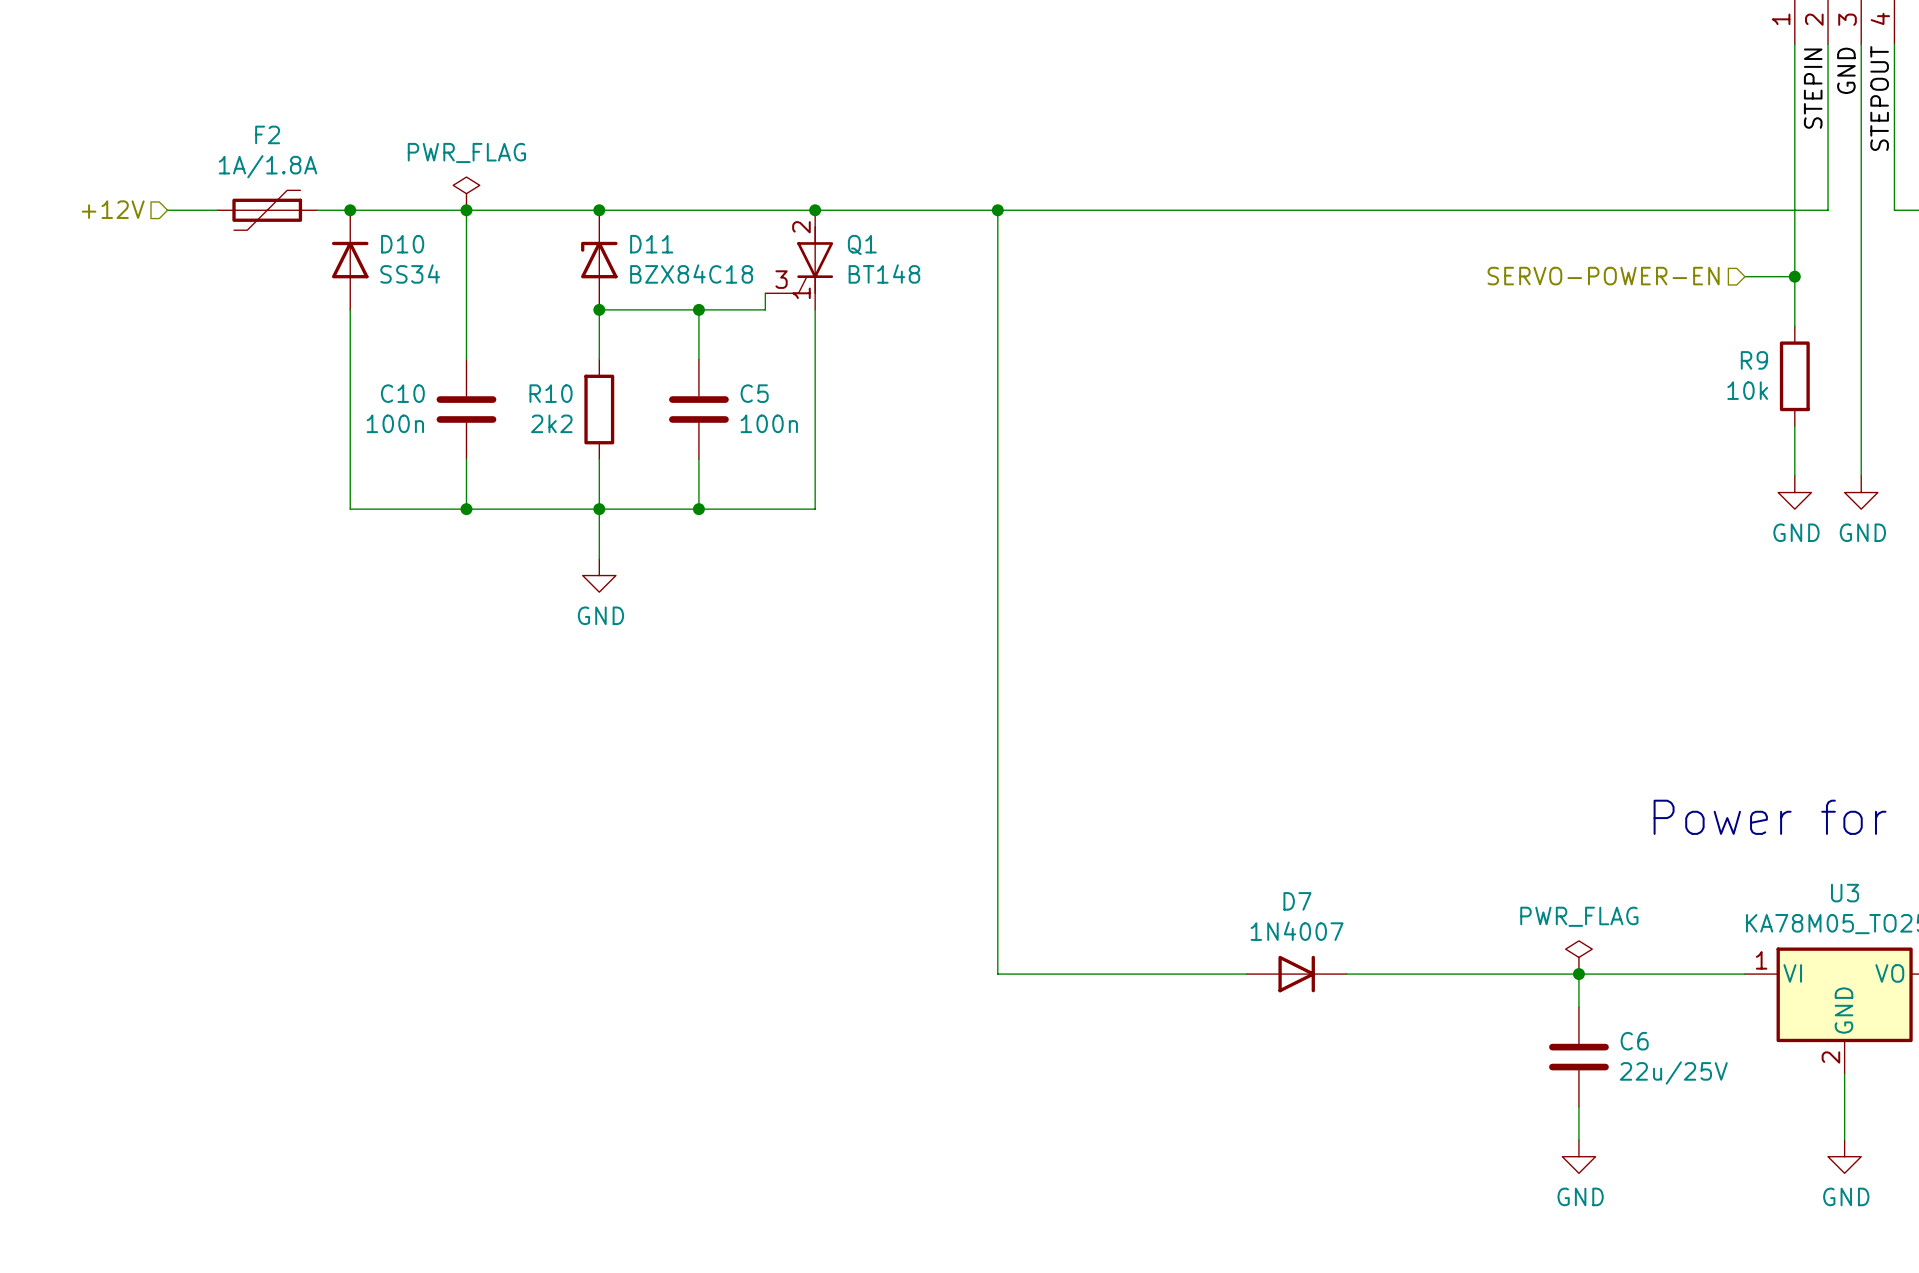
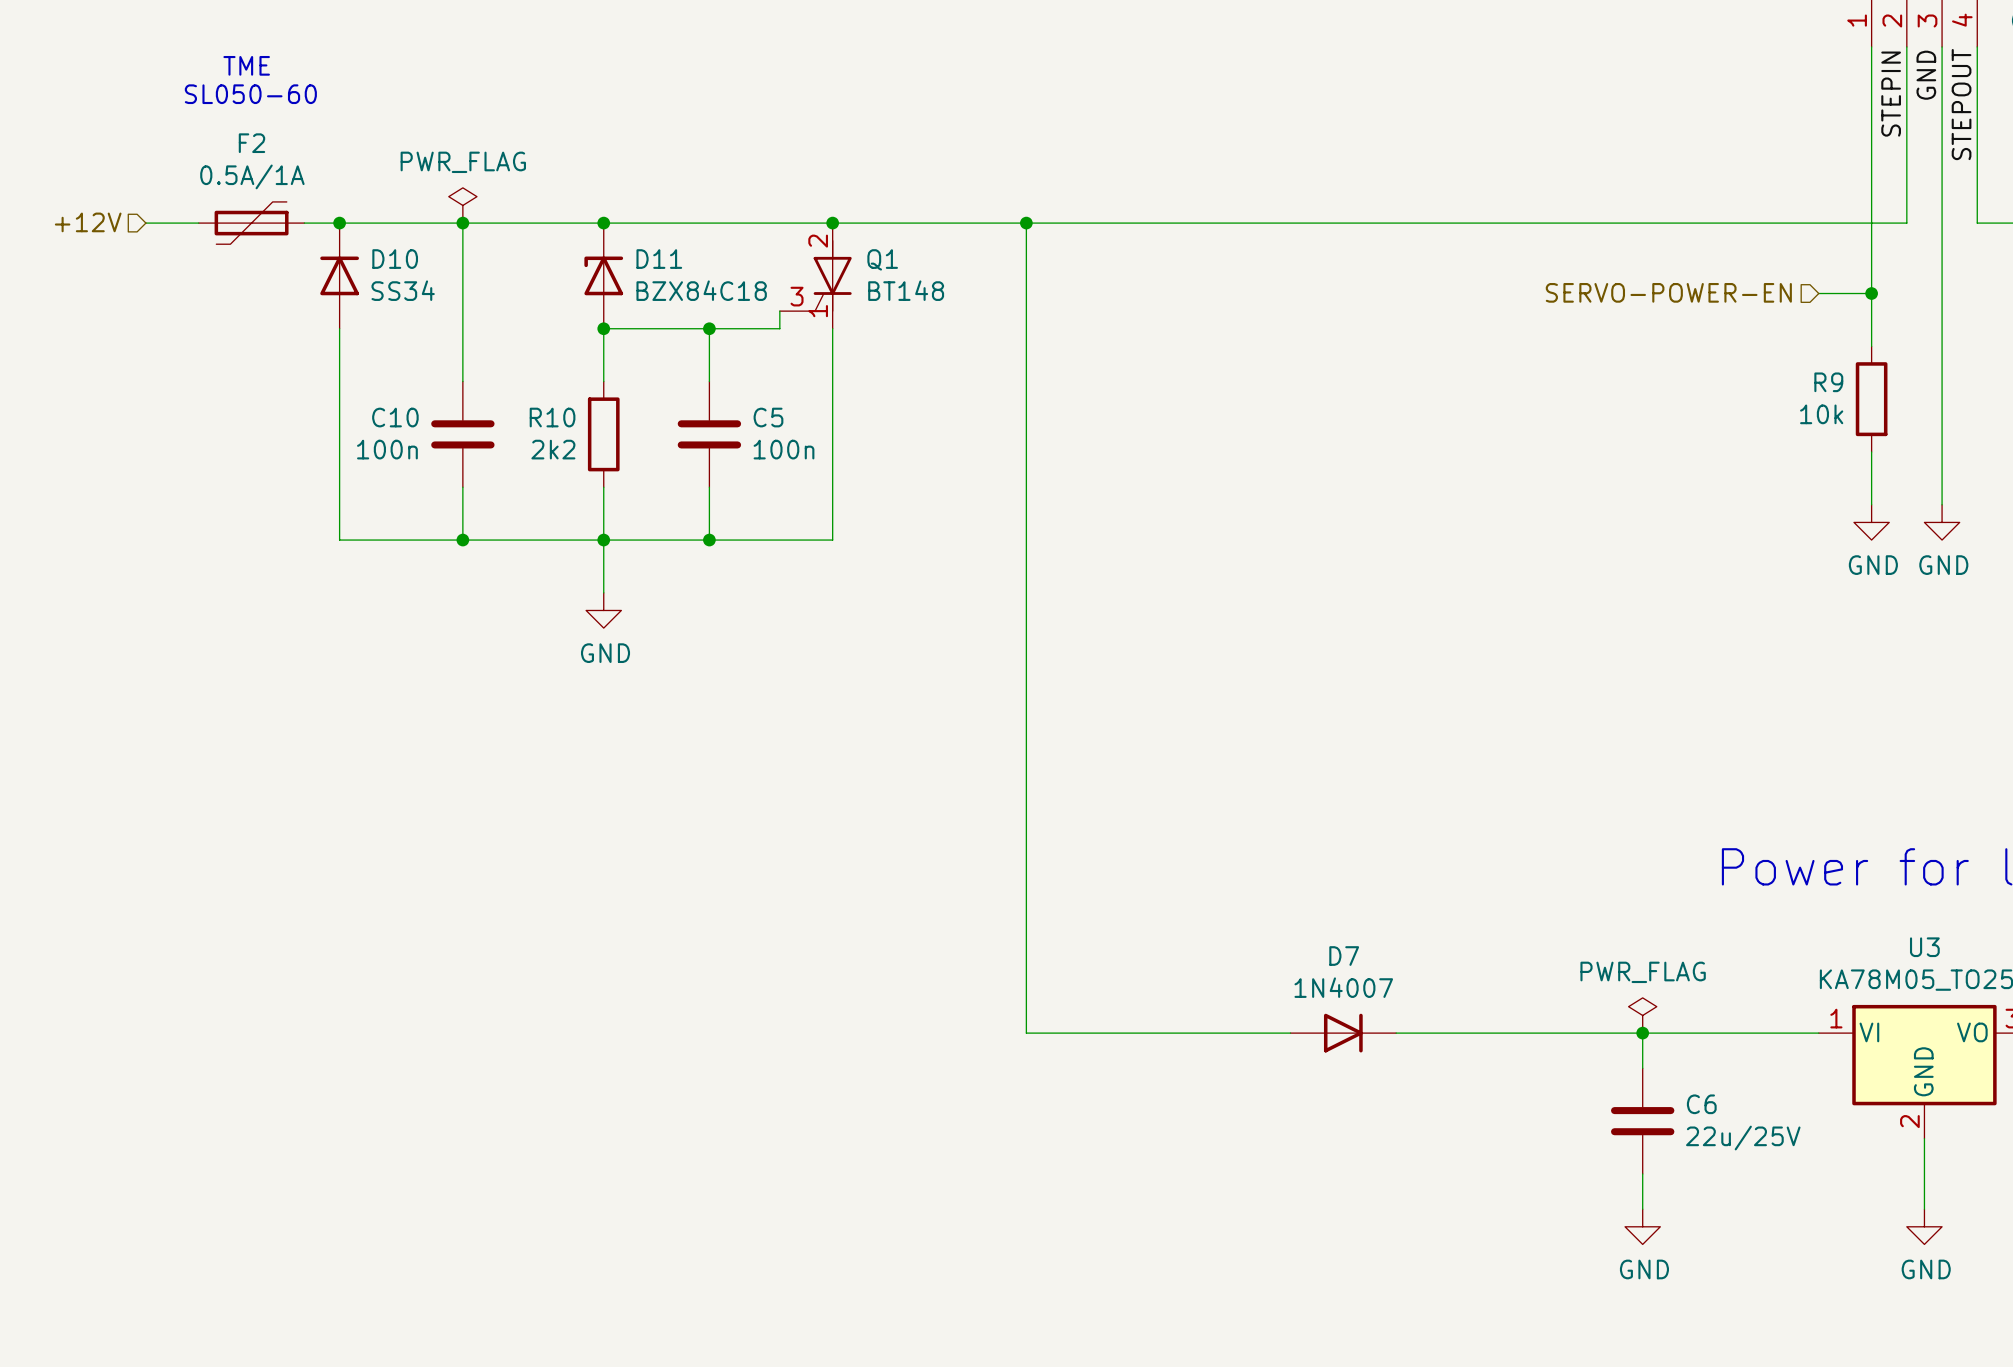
text: none -> TME (246, 65)
text: none -> SL050-60 (250, 94)
F2 value: 1A/1.8A (268, 166) -> 0.5A/1A (252, 176)

